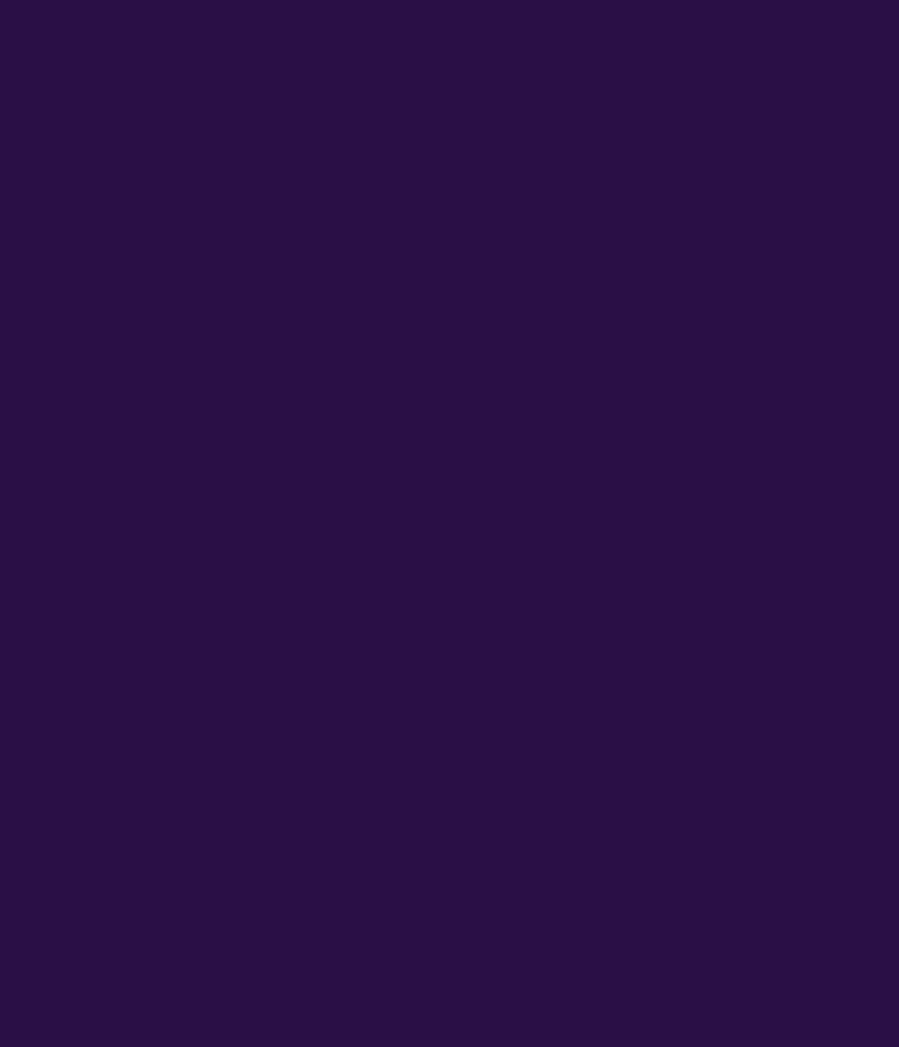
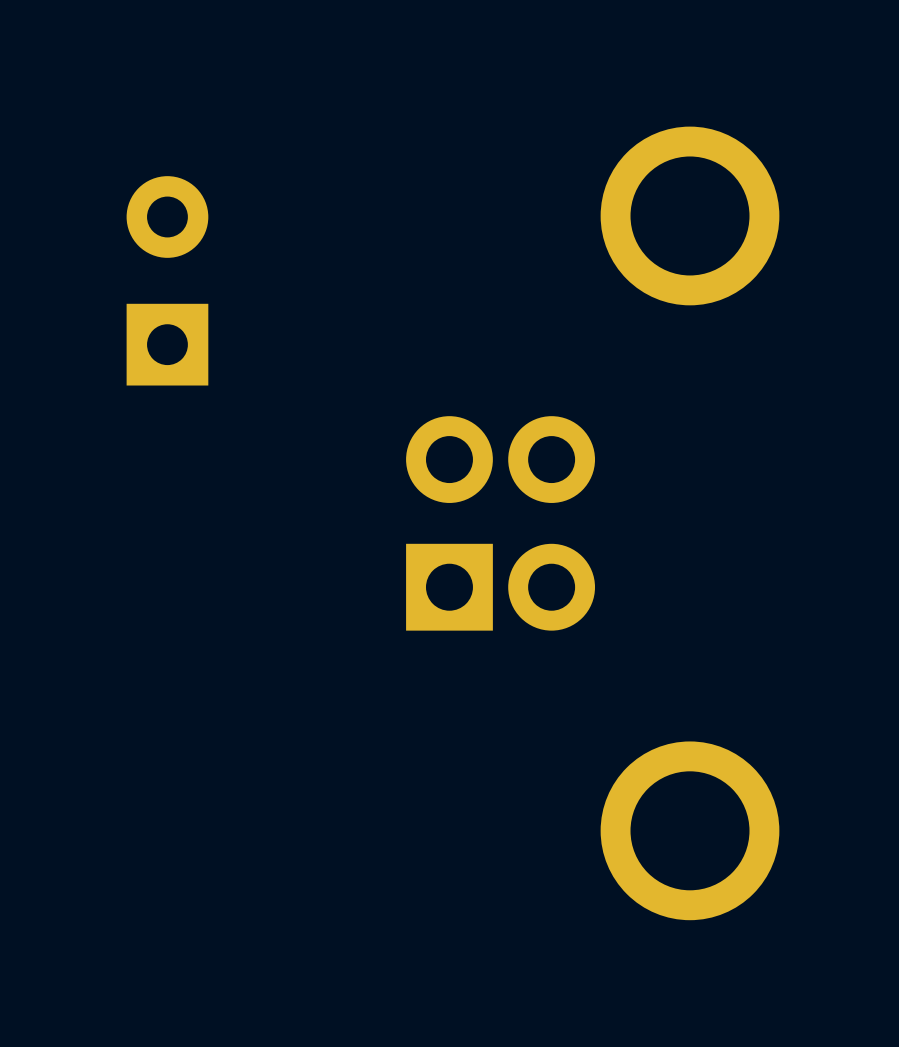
part: none -> (167, 280)
part: none -> (592, 523)

